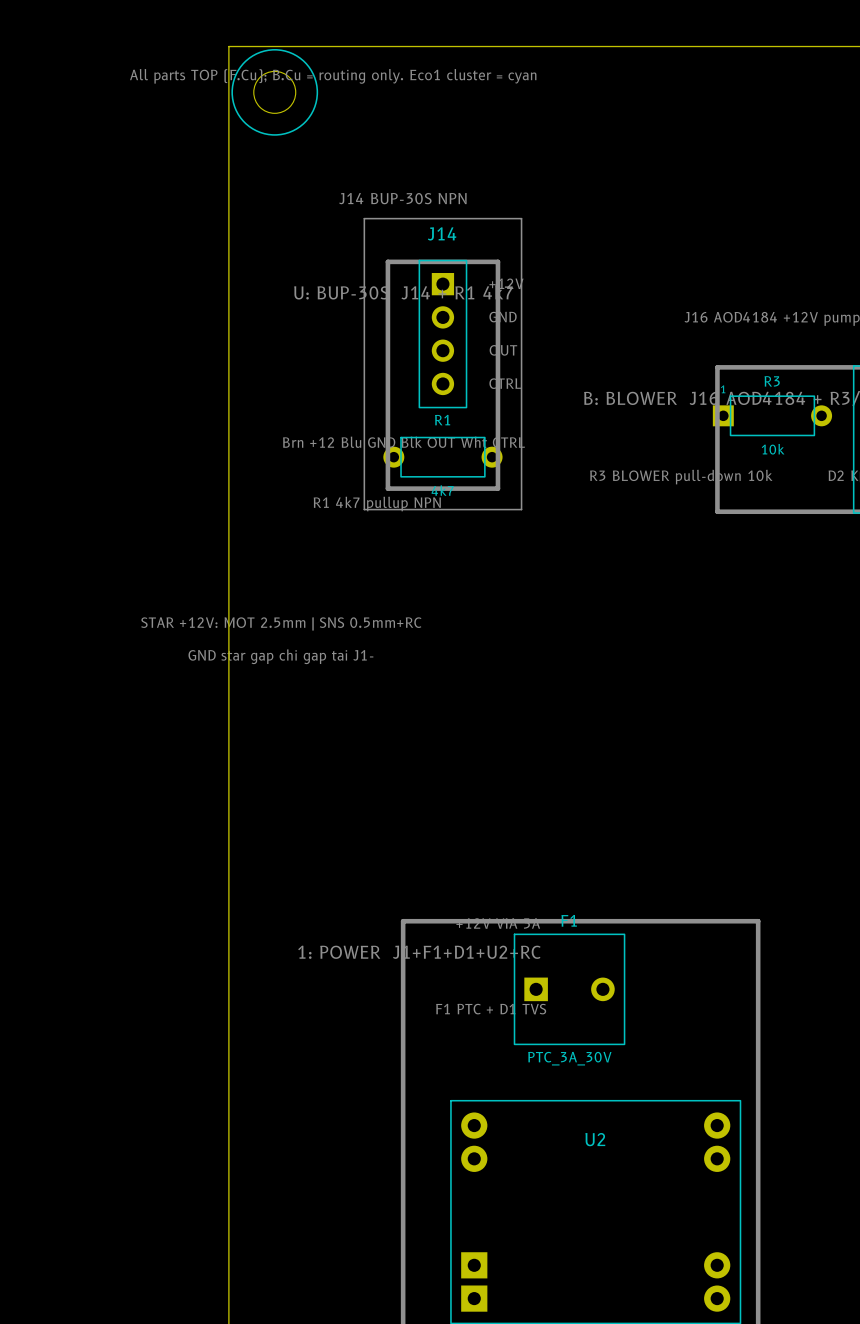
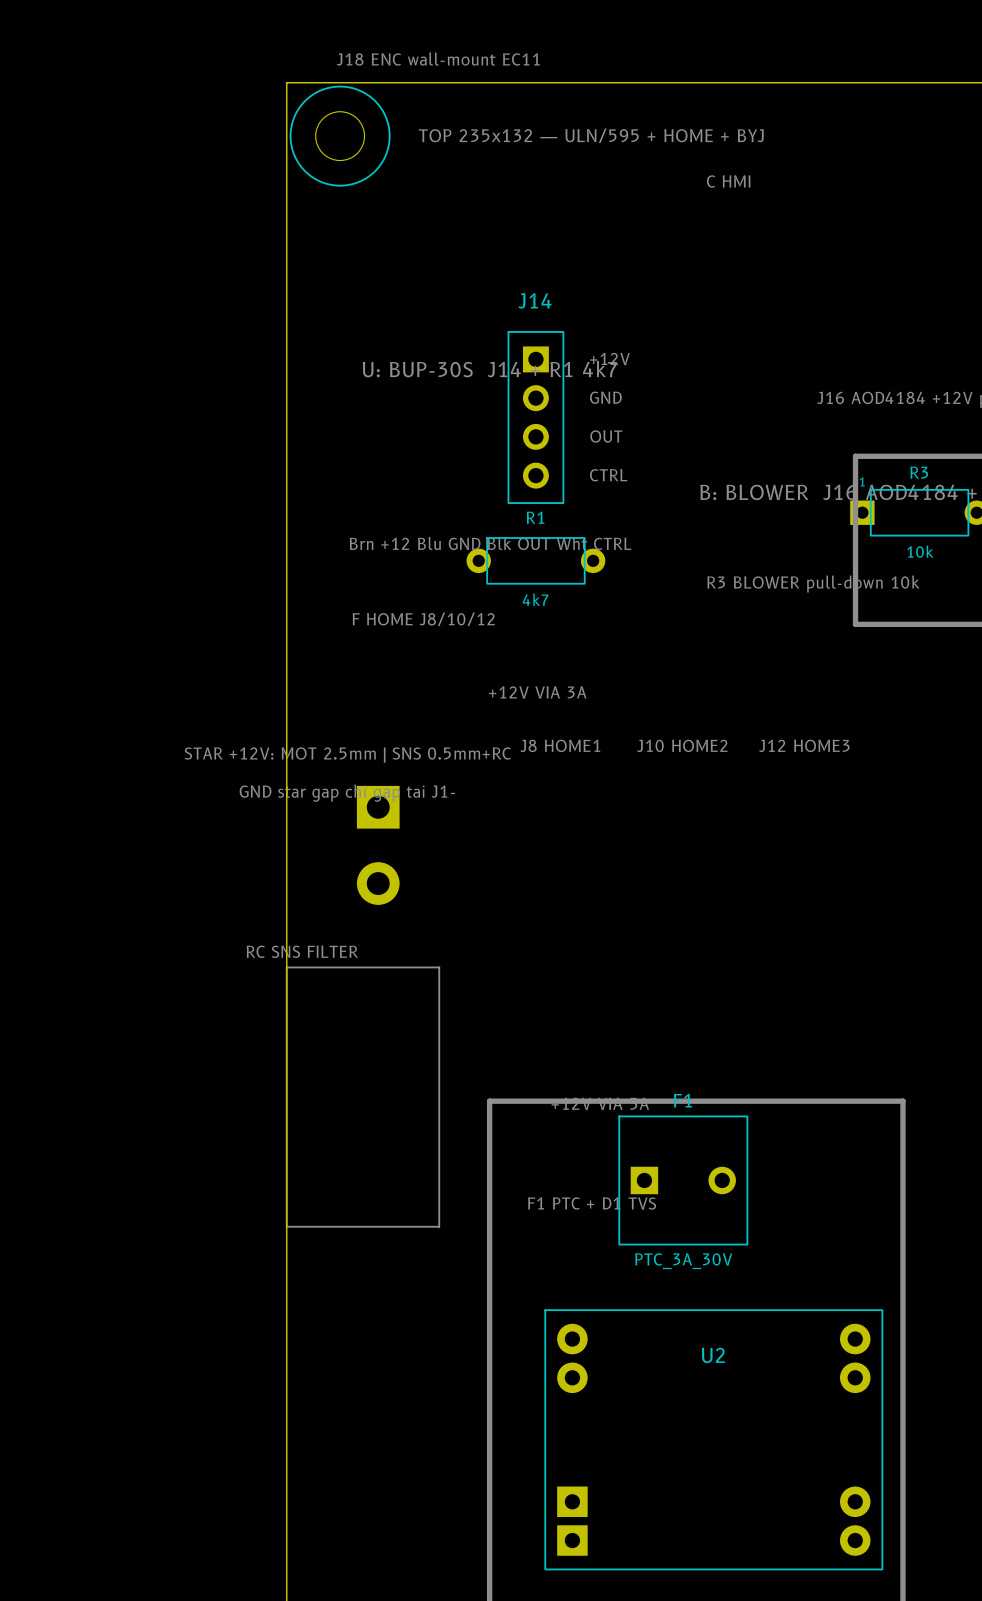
text: none -> J18 ENC wall-mount EC11 (438, 59)
text: All parts TOP (F.Cu); B.Cu = routing only. Eco1 cluster = cyan (333, 76) -> none
text: none -> TOP 235x132 — ULN/595 + HOME + BYJ (591, 135)
text: none -> C HMI (728, 181)
text: J14 BUP-30S NPN (402, 198) -> none
line: (364, 218) (521, 218) (521, 509) (364, 509) (364, 218) -> none
line: (387, 261) (497, 261) (497, 488) (387, 488) (387, 261) -> none
text: R1 4k7 pullup NPN (377, 504) -> none
text: none -> F HOME J8/10/12 (423, 619)
text: none -> +12V VIA 3A (537, 692)
text: none -> J8 HOME1 (560, 745)
text: none -> J10 HOME2 (682, 745)
text: none -> J12 HOME3 (804, 745)
part: none -> (378, 845)
text: none -> RC SNS FILTER (302, 951)
line: none -> (286, 967) (286, 1226) (439, 1226) (439, 967) (286, 967)
text: 1: POWER J1+F1+D1+U2+RC (419, 952) -> none

